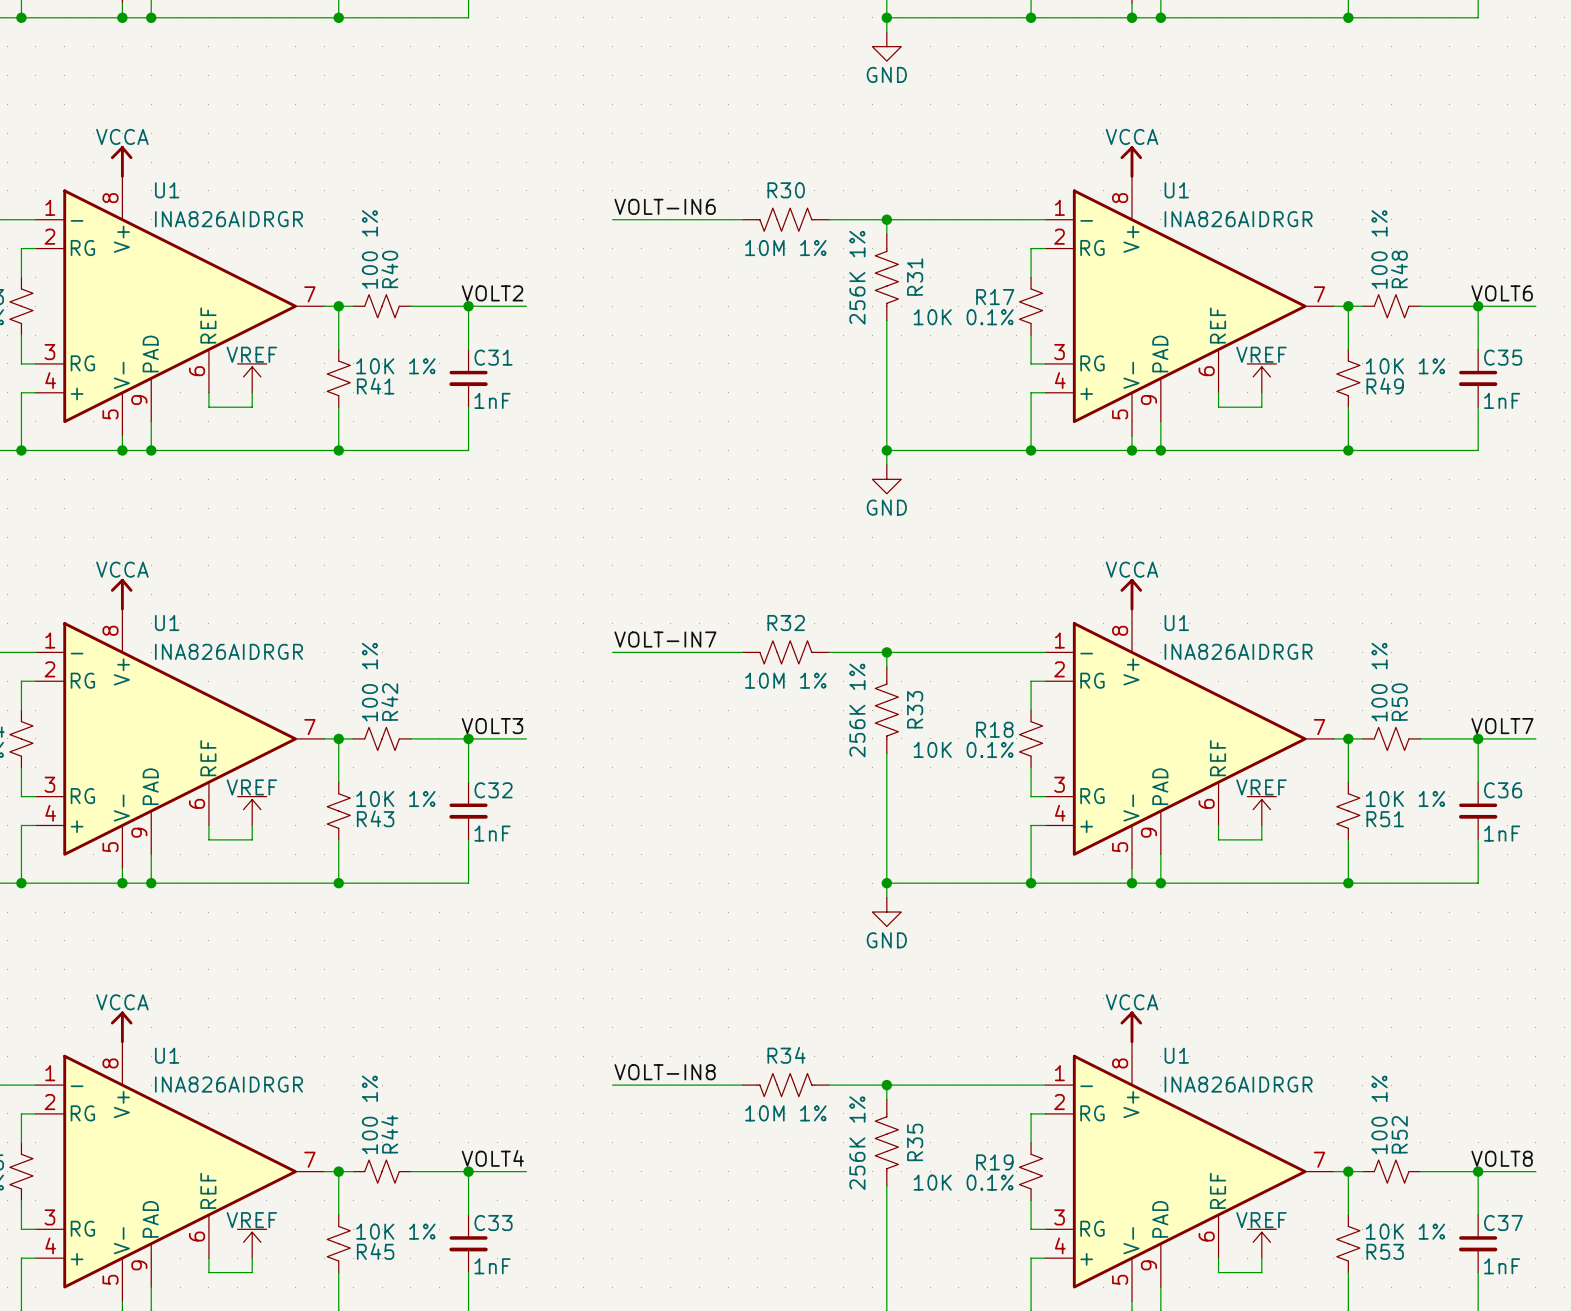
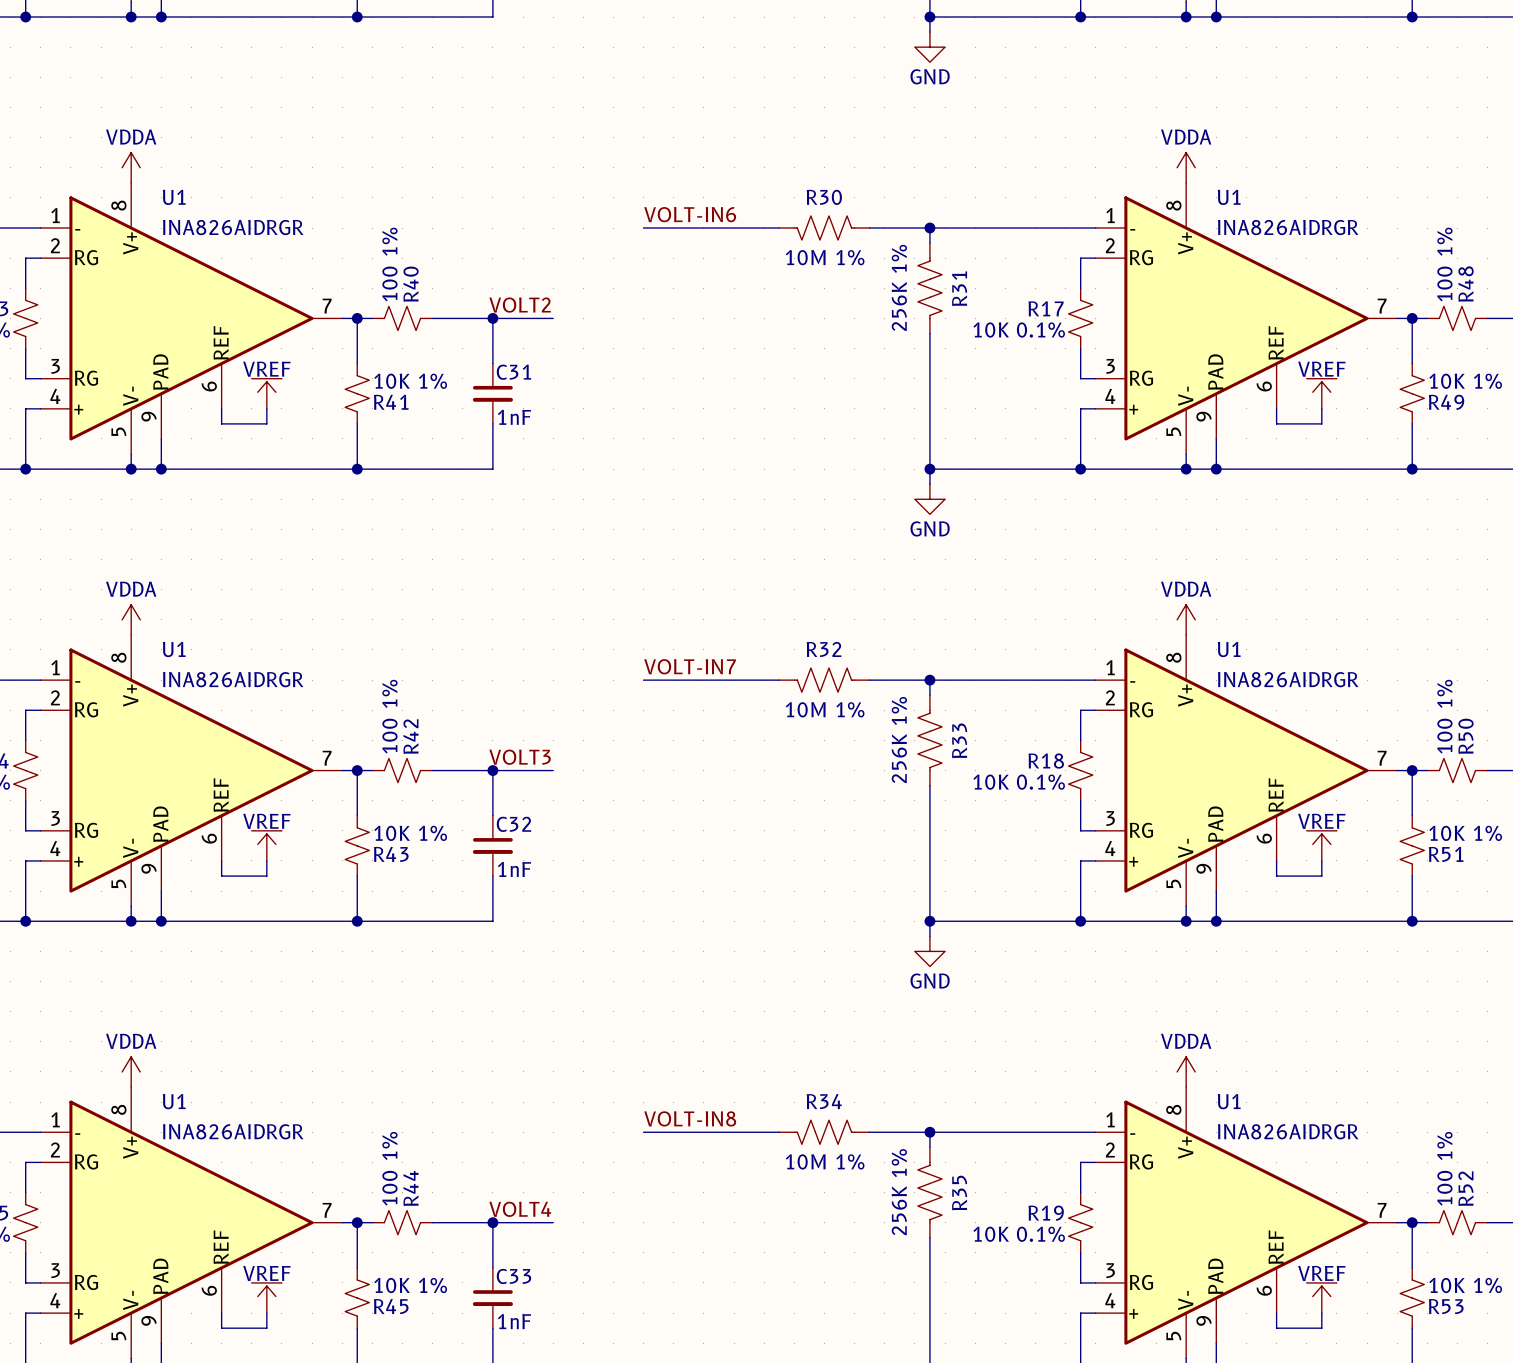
power symbol: VCCA (121, 162) -> VDDA (131, 167)
power symbol: VCCA (1131, 162) -> VDDA (1186, 167)
power symbol: VCCA (121, 594) -> VDDA (131, 619)
power symbol: VCCA (1131, 594) -> VDDA (1186, 619)
power symbol: VCCA (121, 1027) -> VDDA (131, 1071)
power symbol: VCCA (1131, 1027) -> VDDA (1186, 1071)

